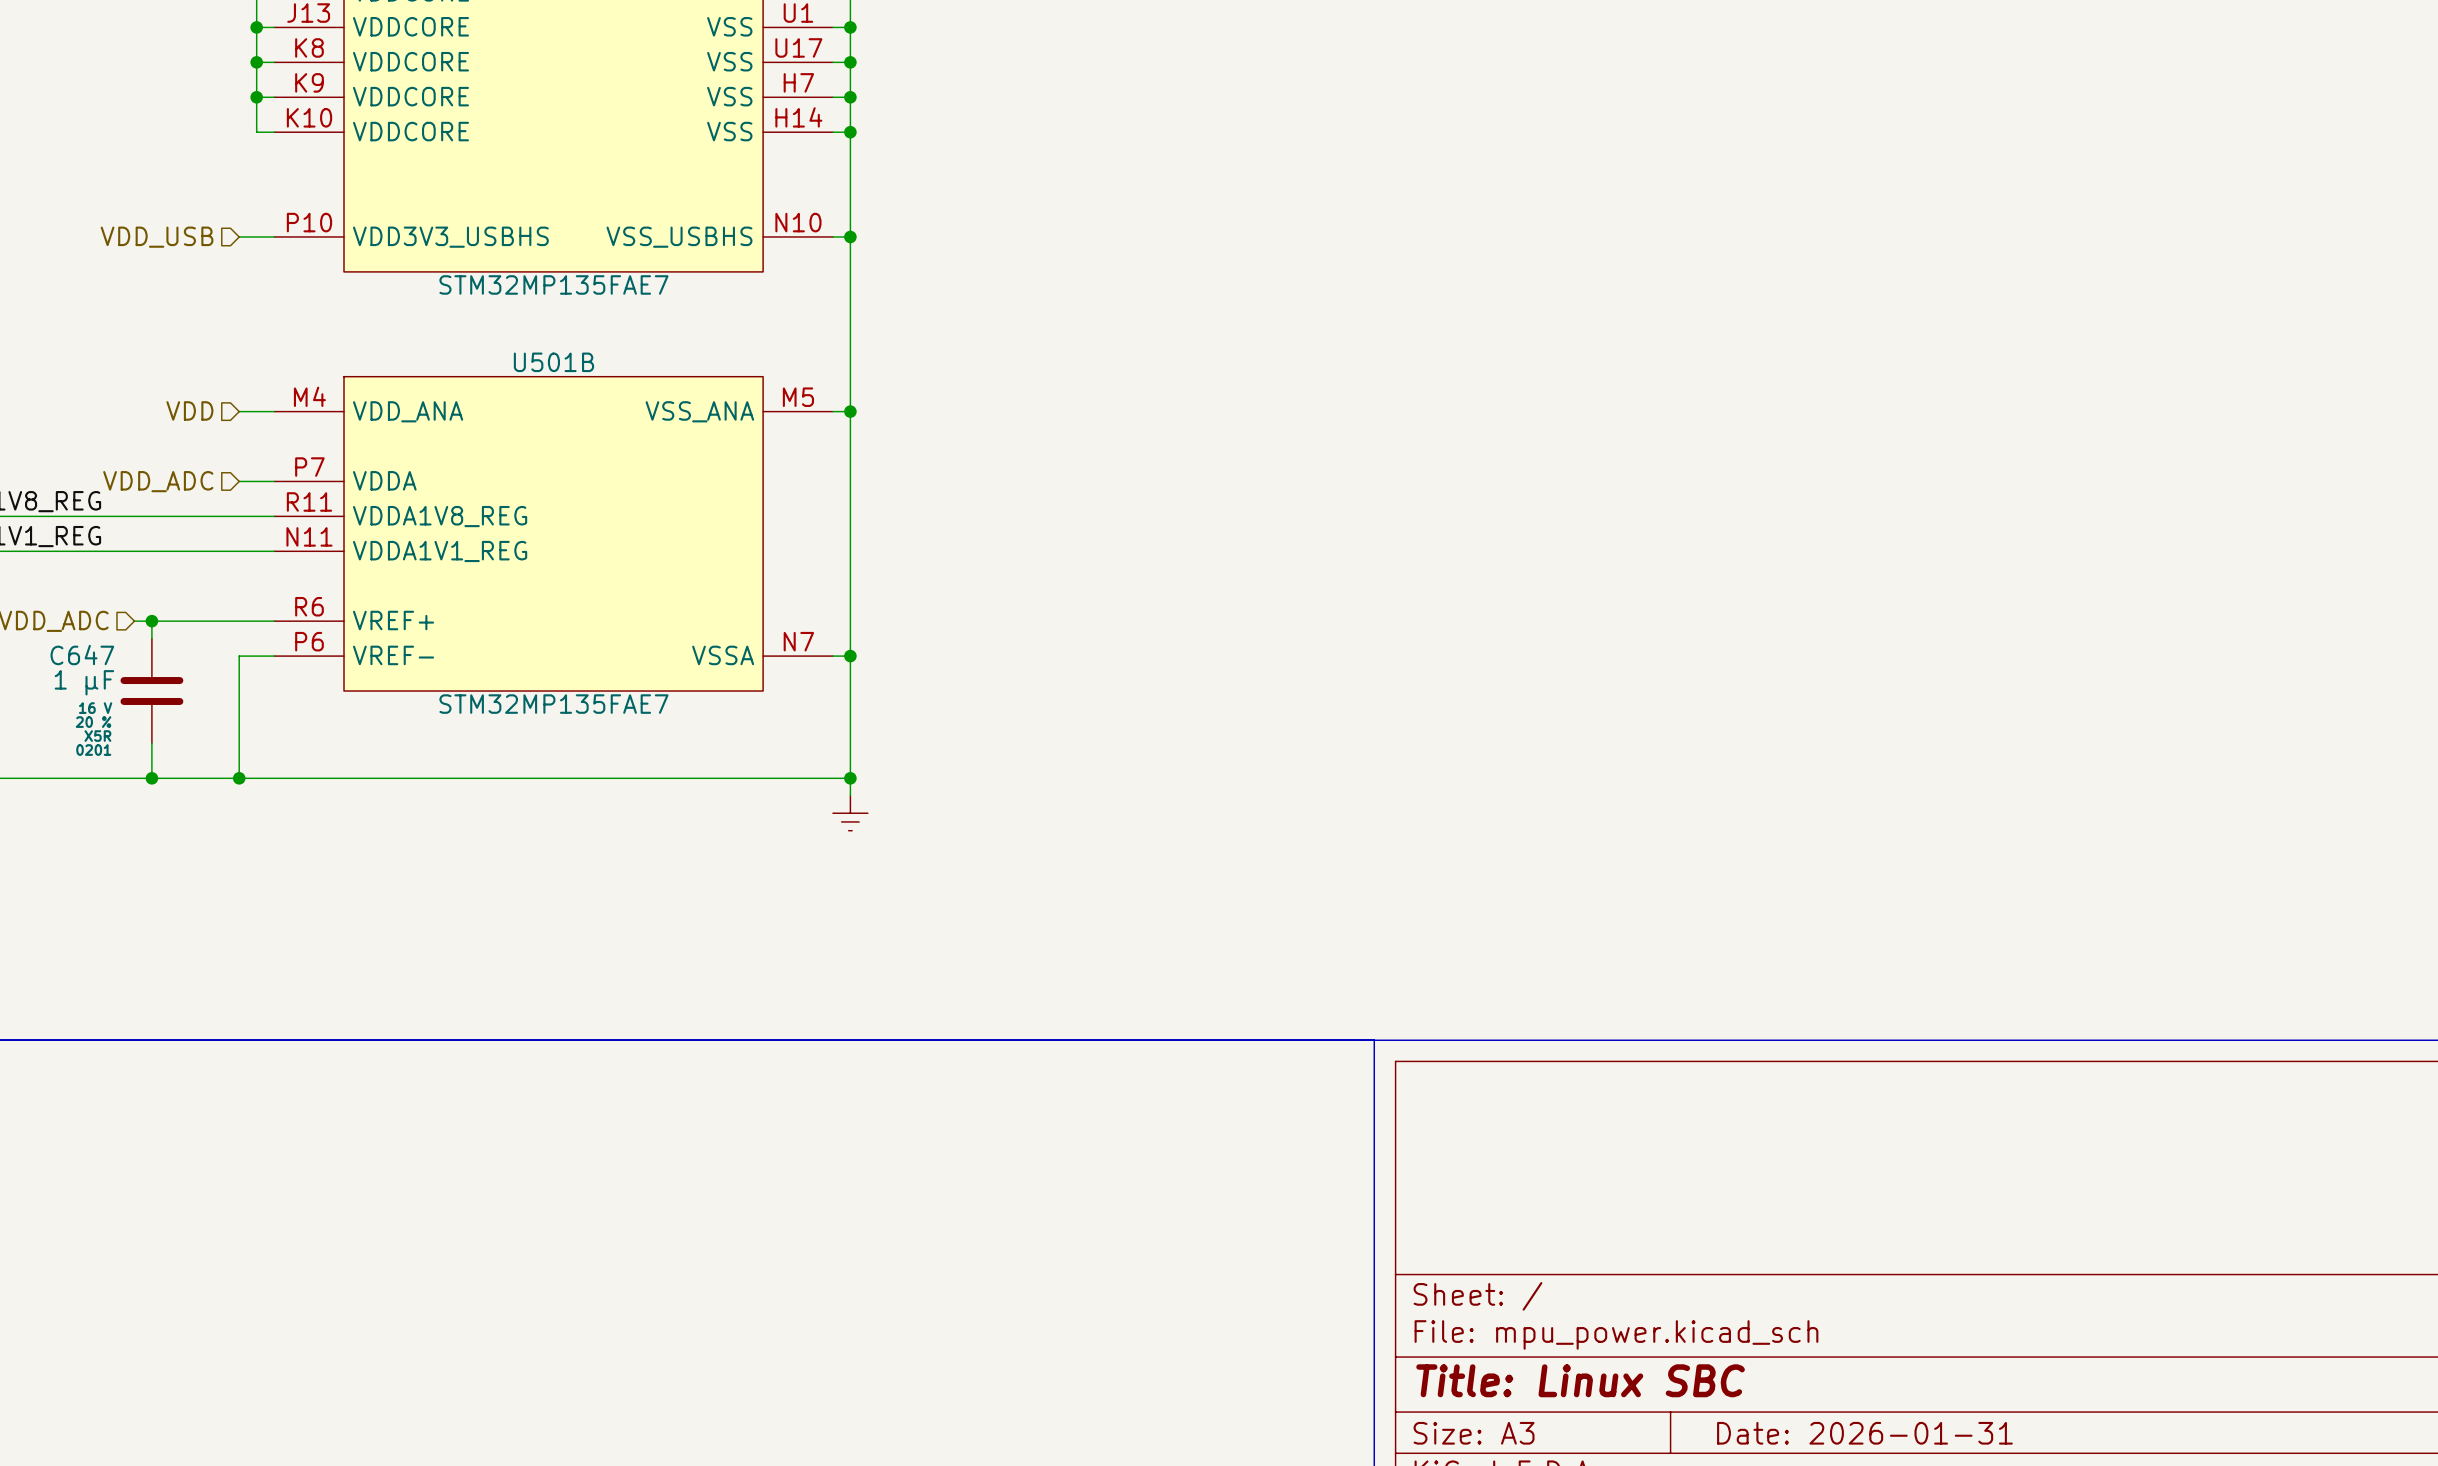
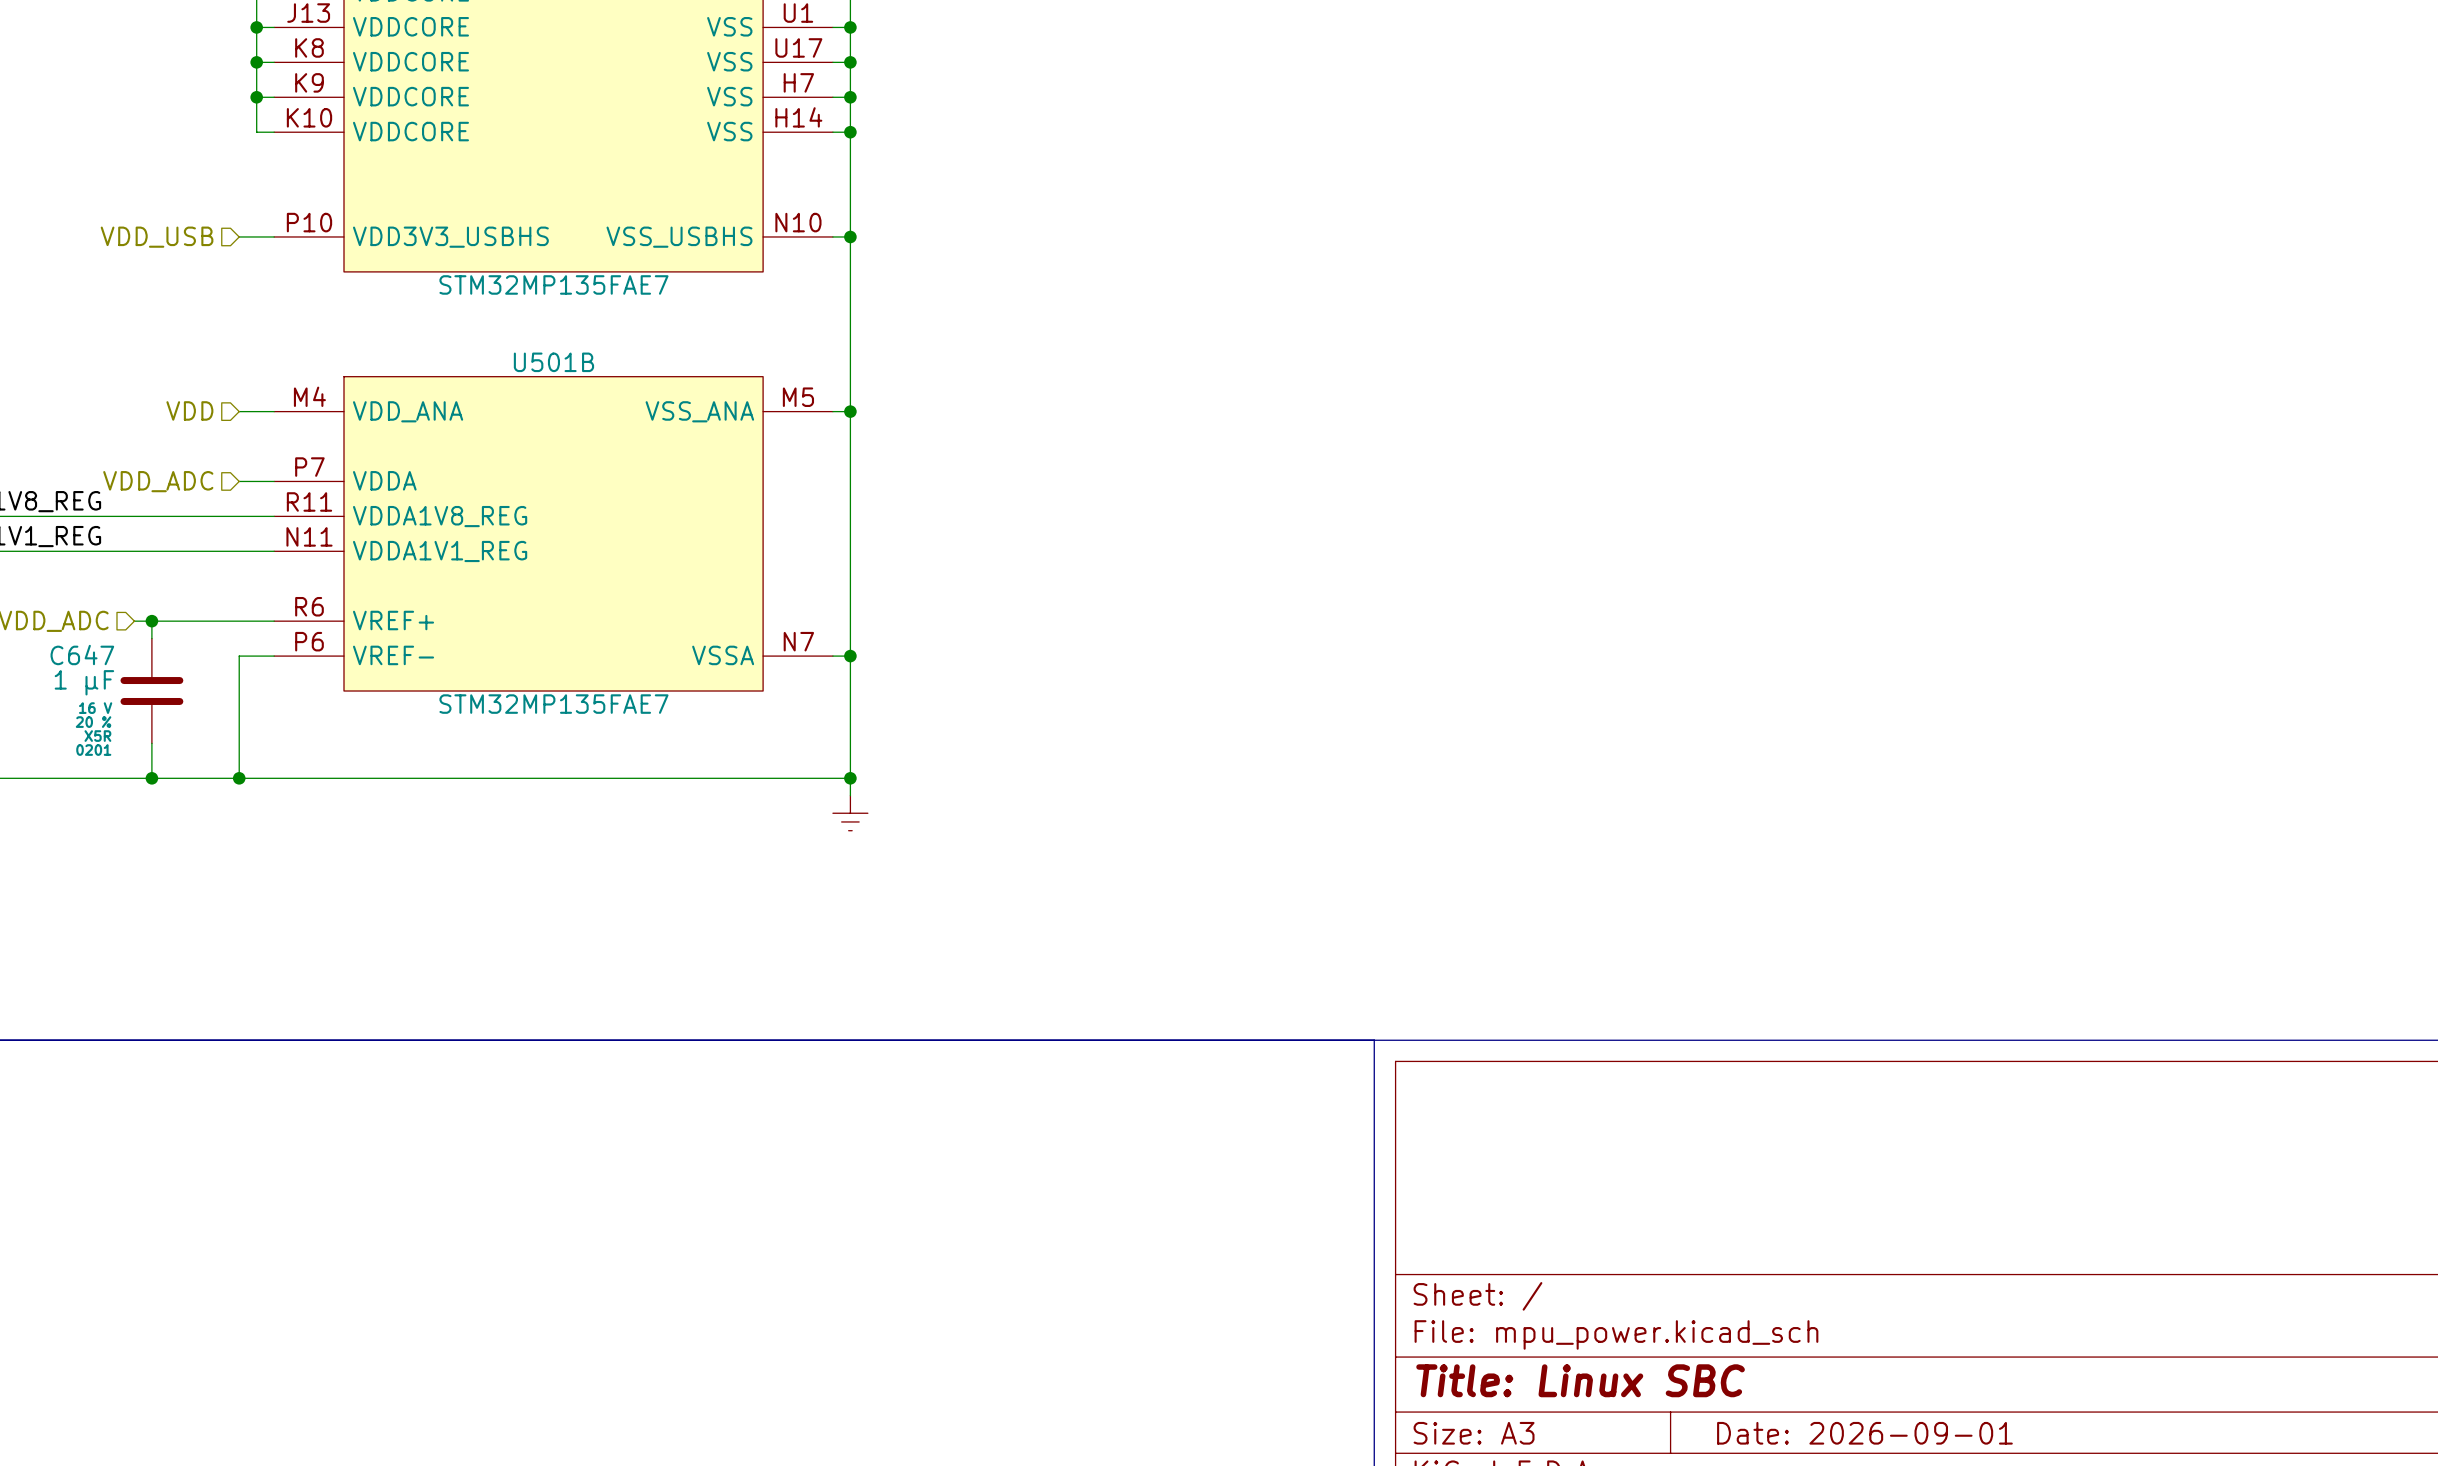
title block: Date: 2026-01-31 (1864, 1433) -> Date: 2026-09-01 (1864, 1433)

